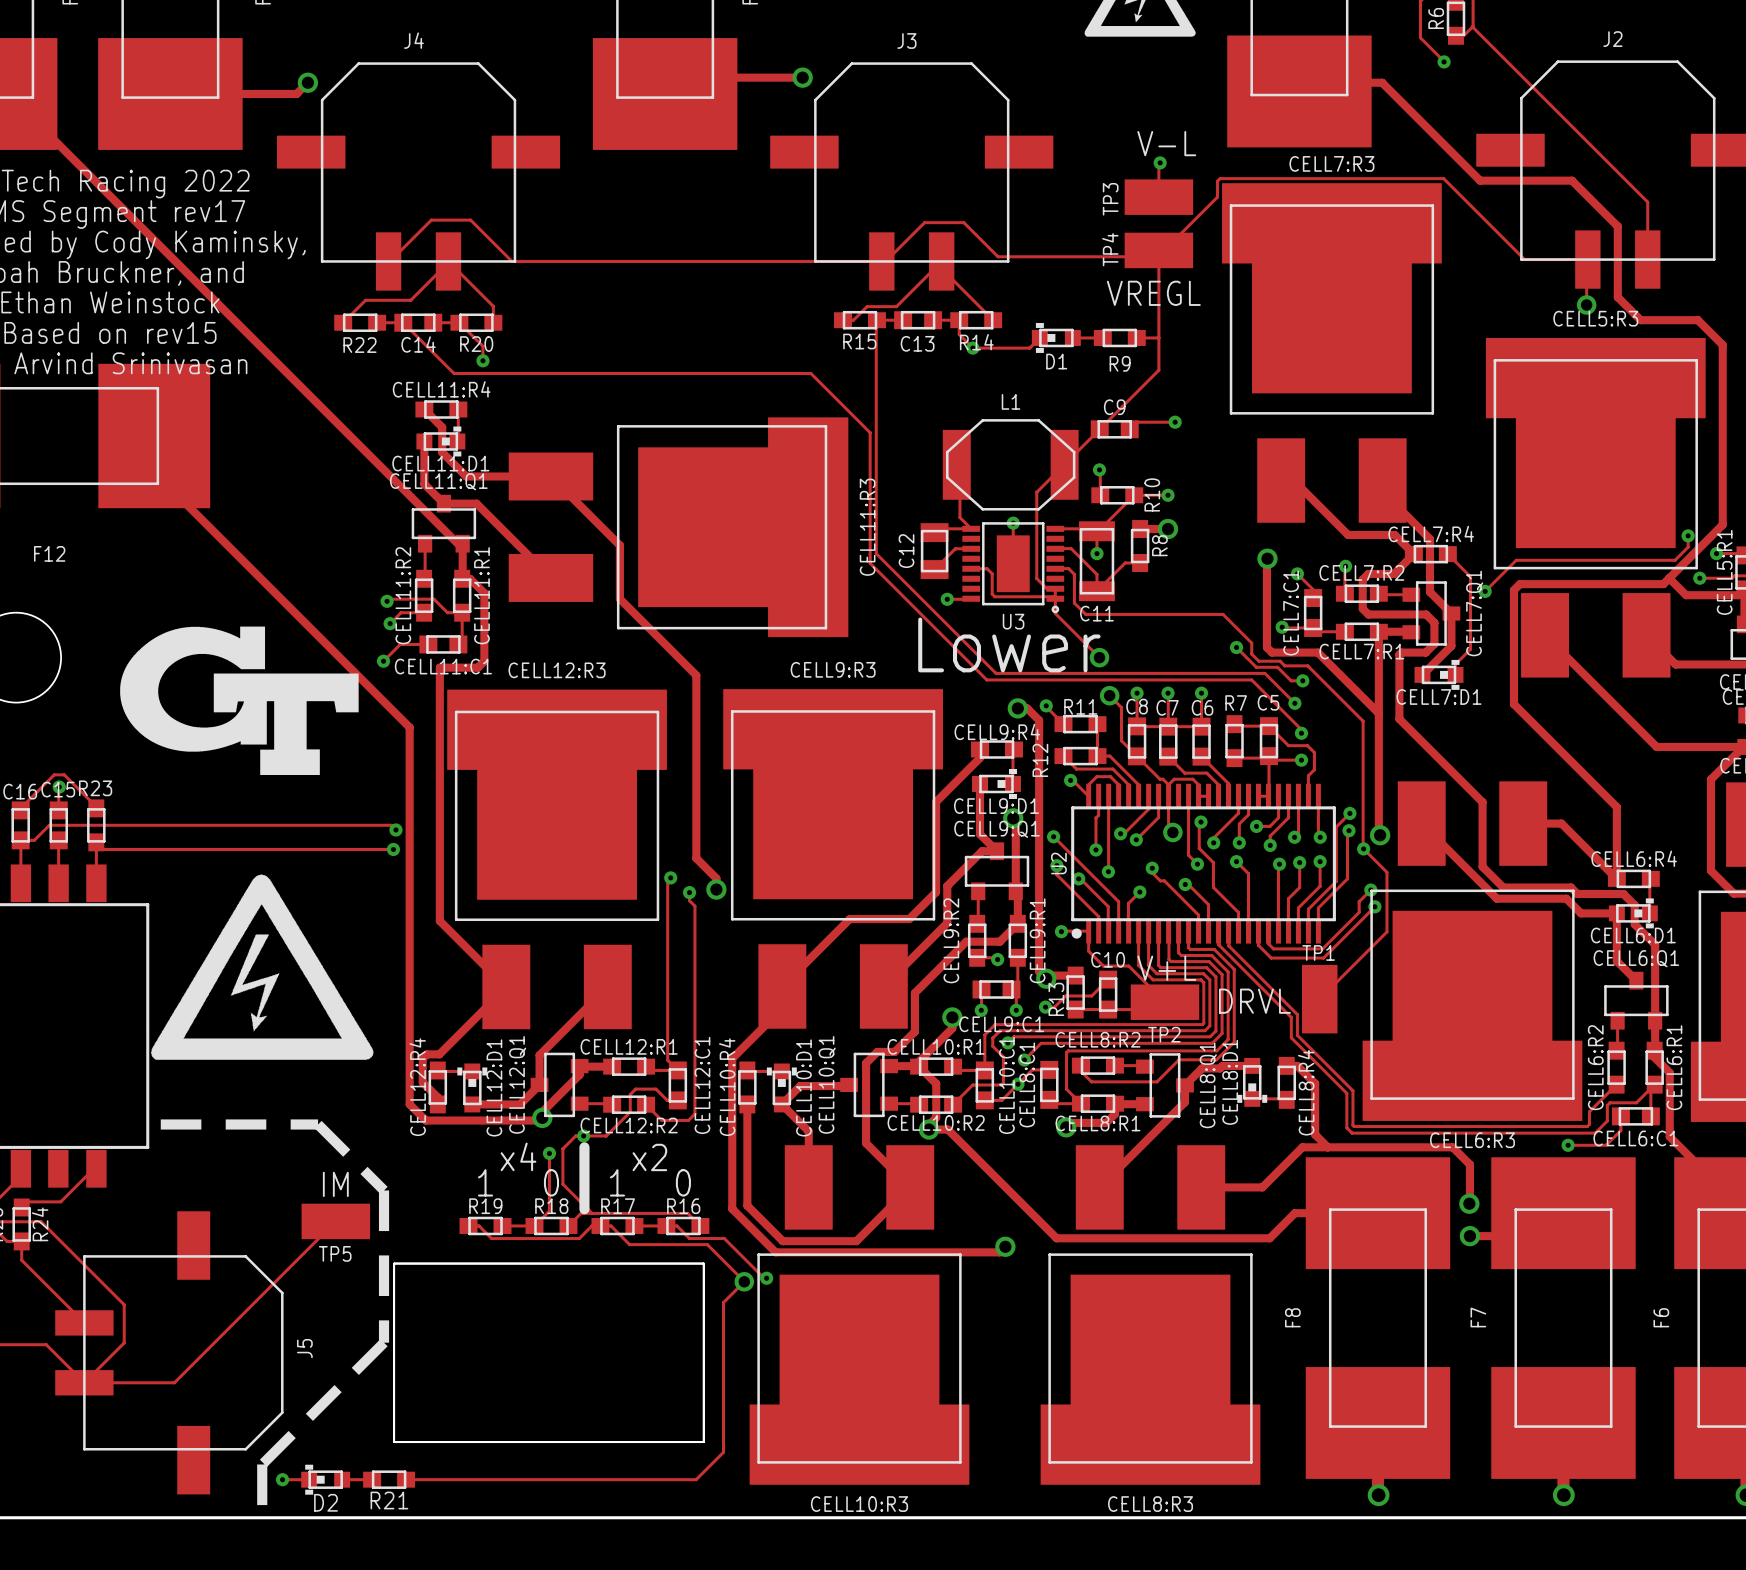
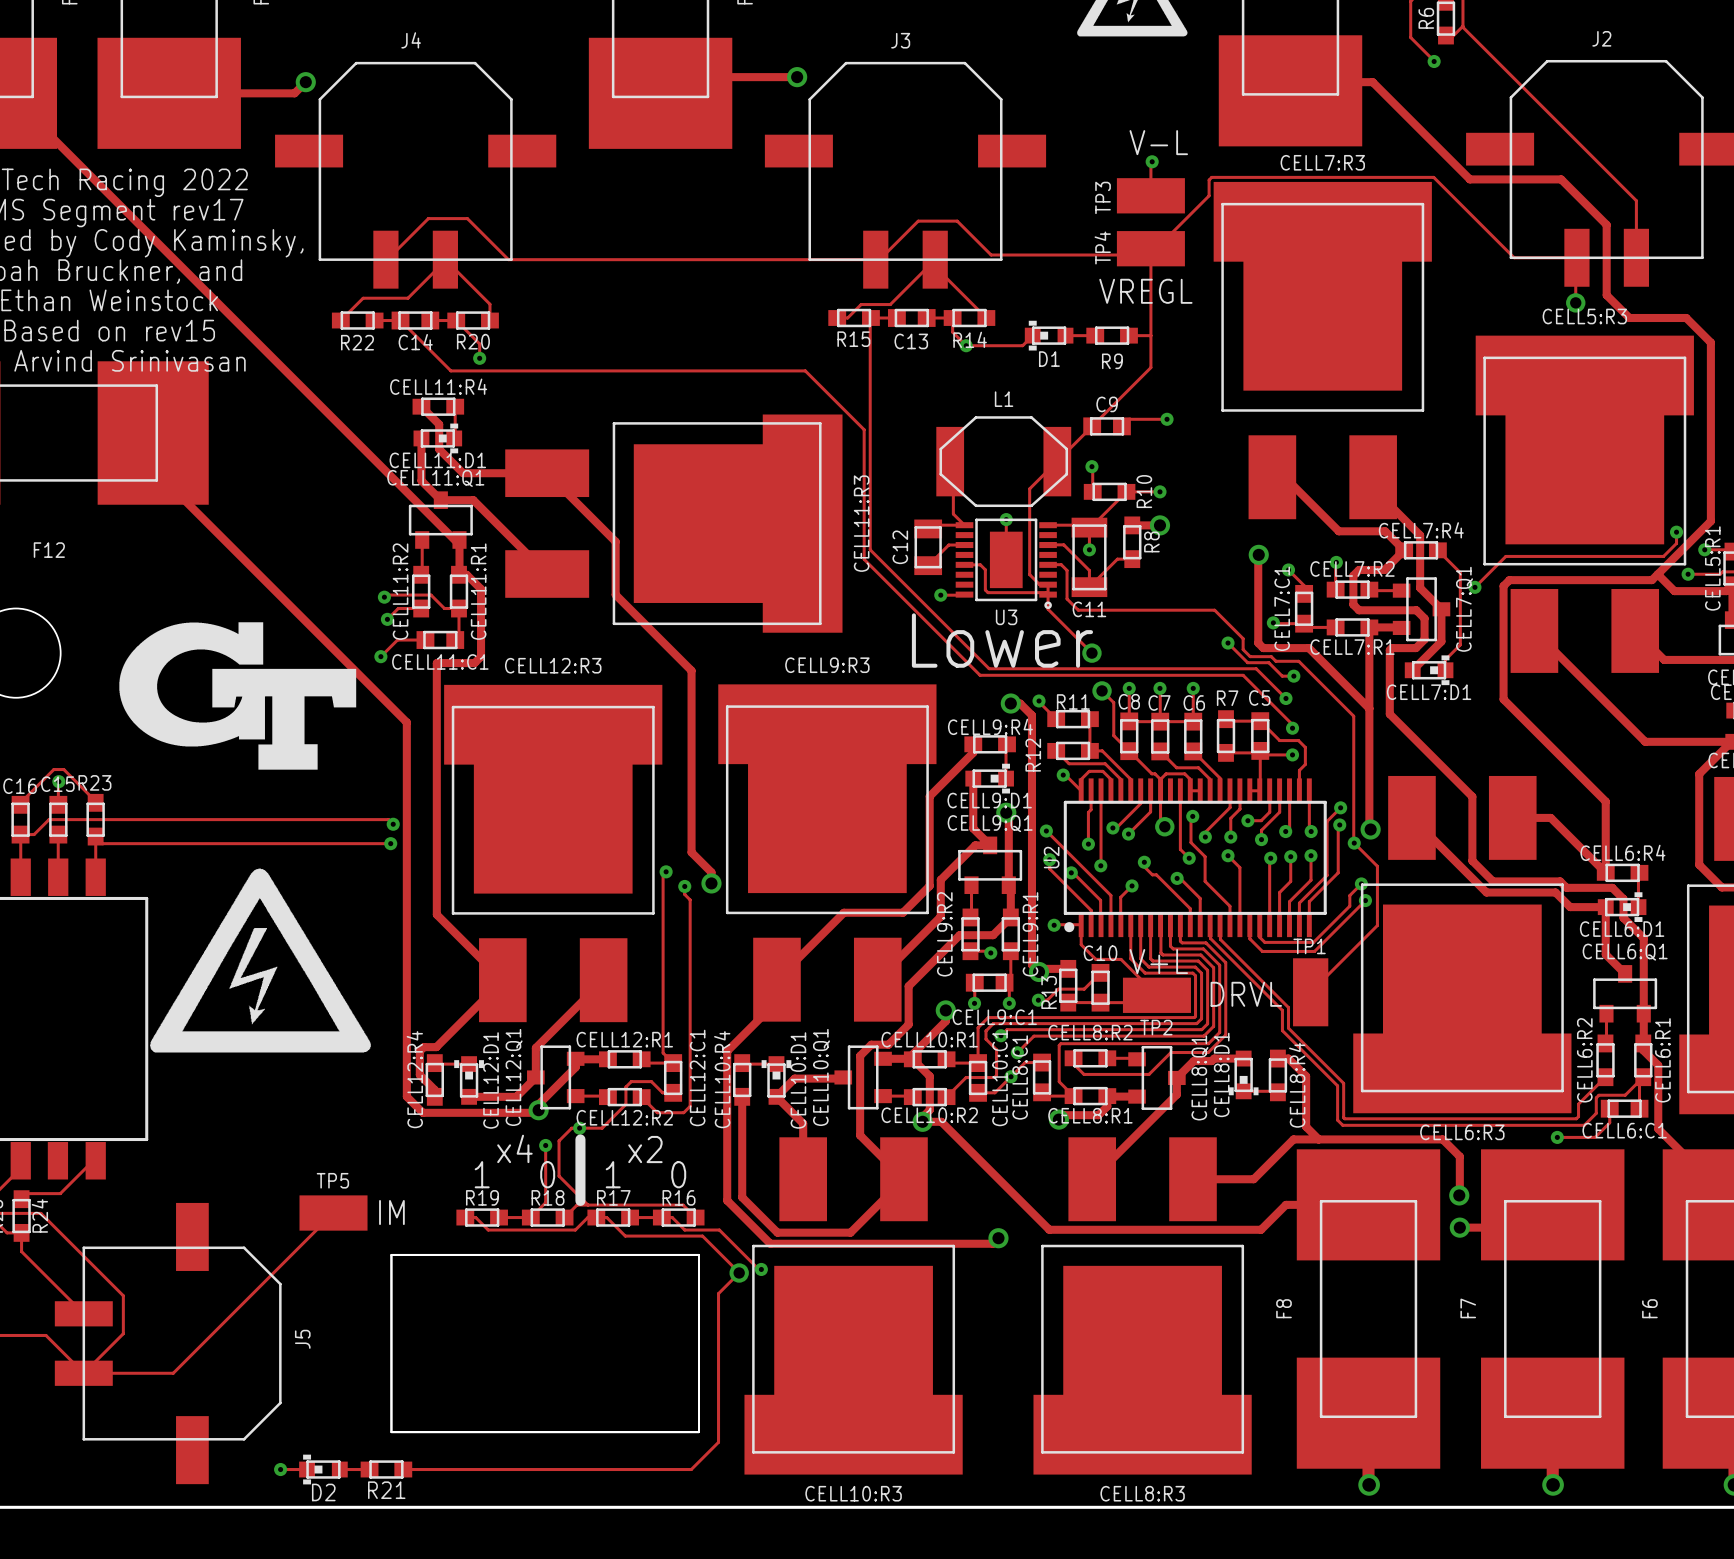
line: (160, 1124) (318, 1124) (384, 1190) (384, 1342) (262, 1464) (262, 1510) -> none
text position: IM (335, 1184) -> IM (391, 1212)
TP5 name position: TP5 (335, 1253) -> TP5 (332, 1180)

